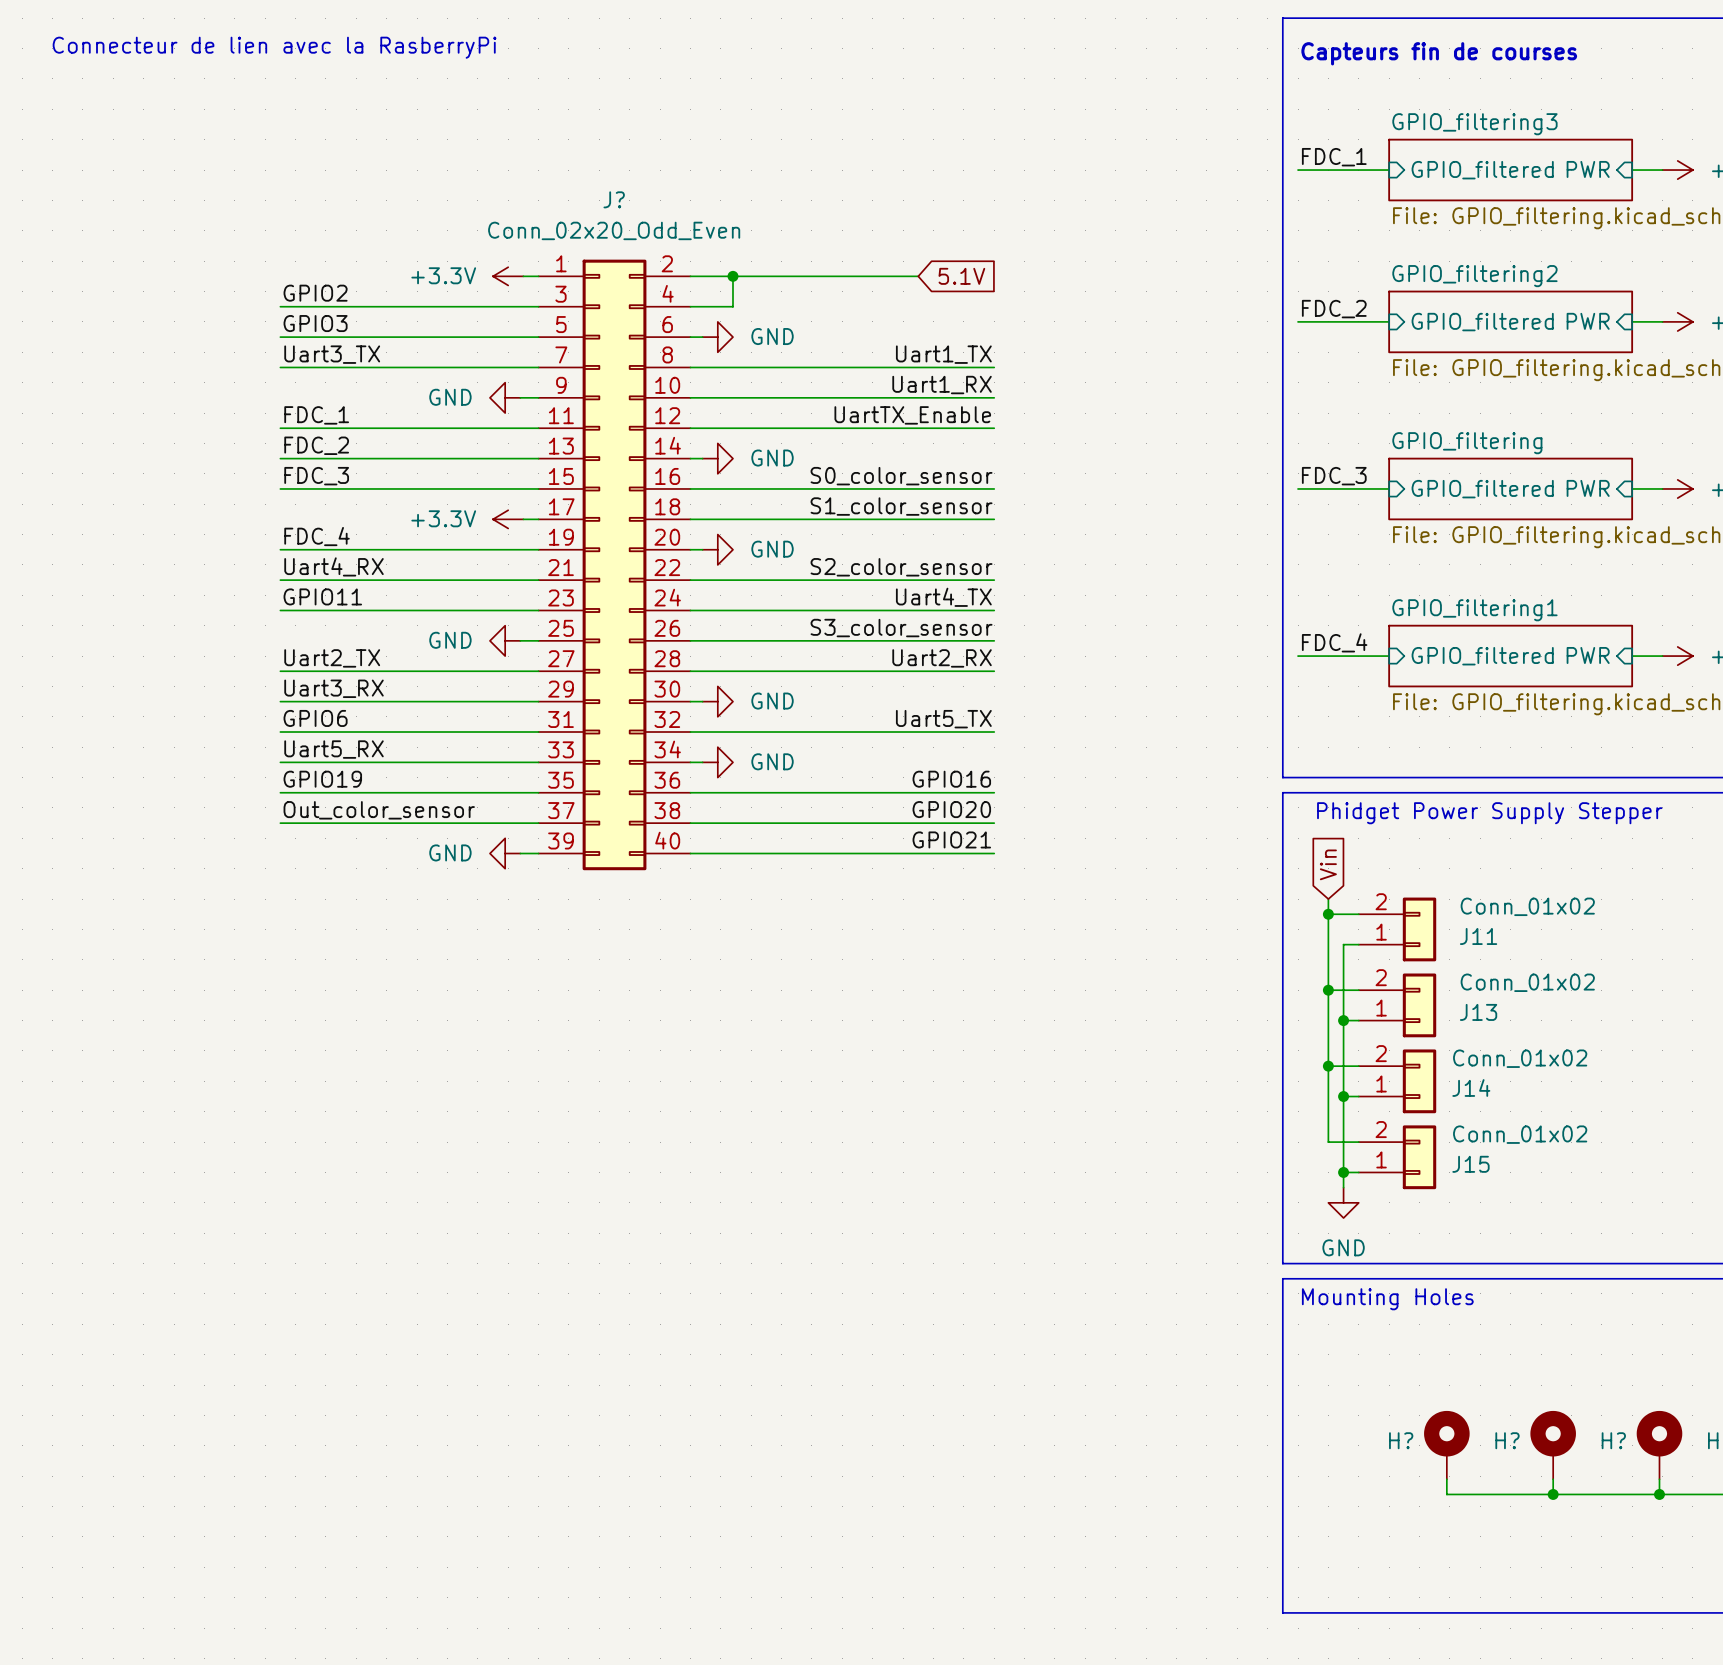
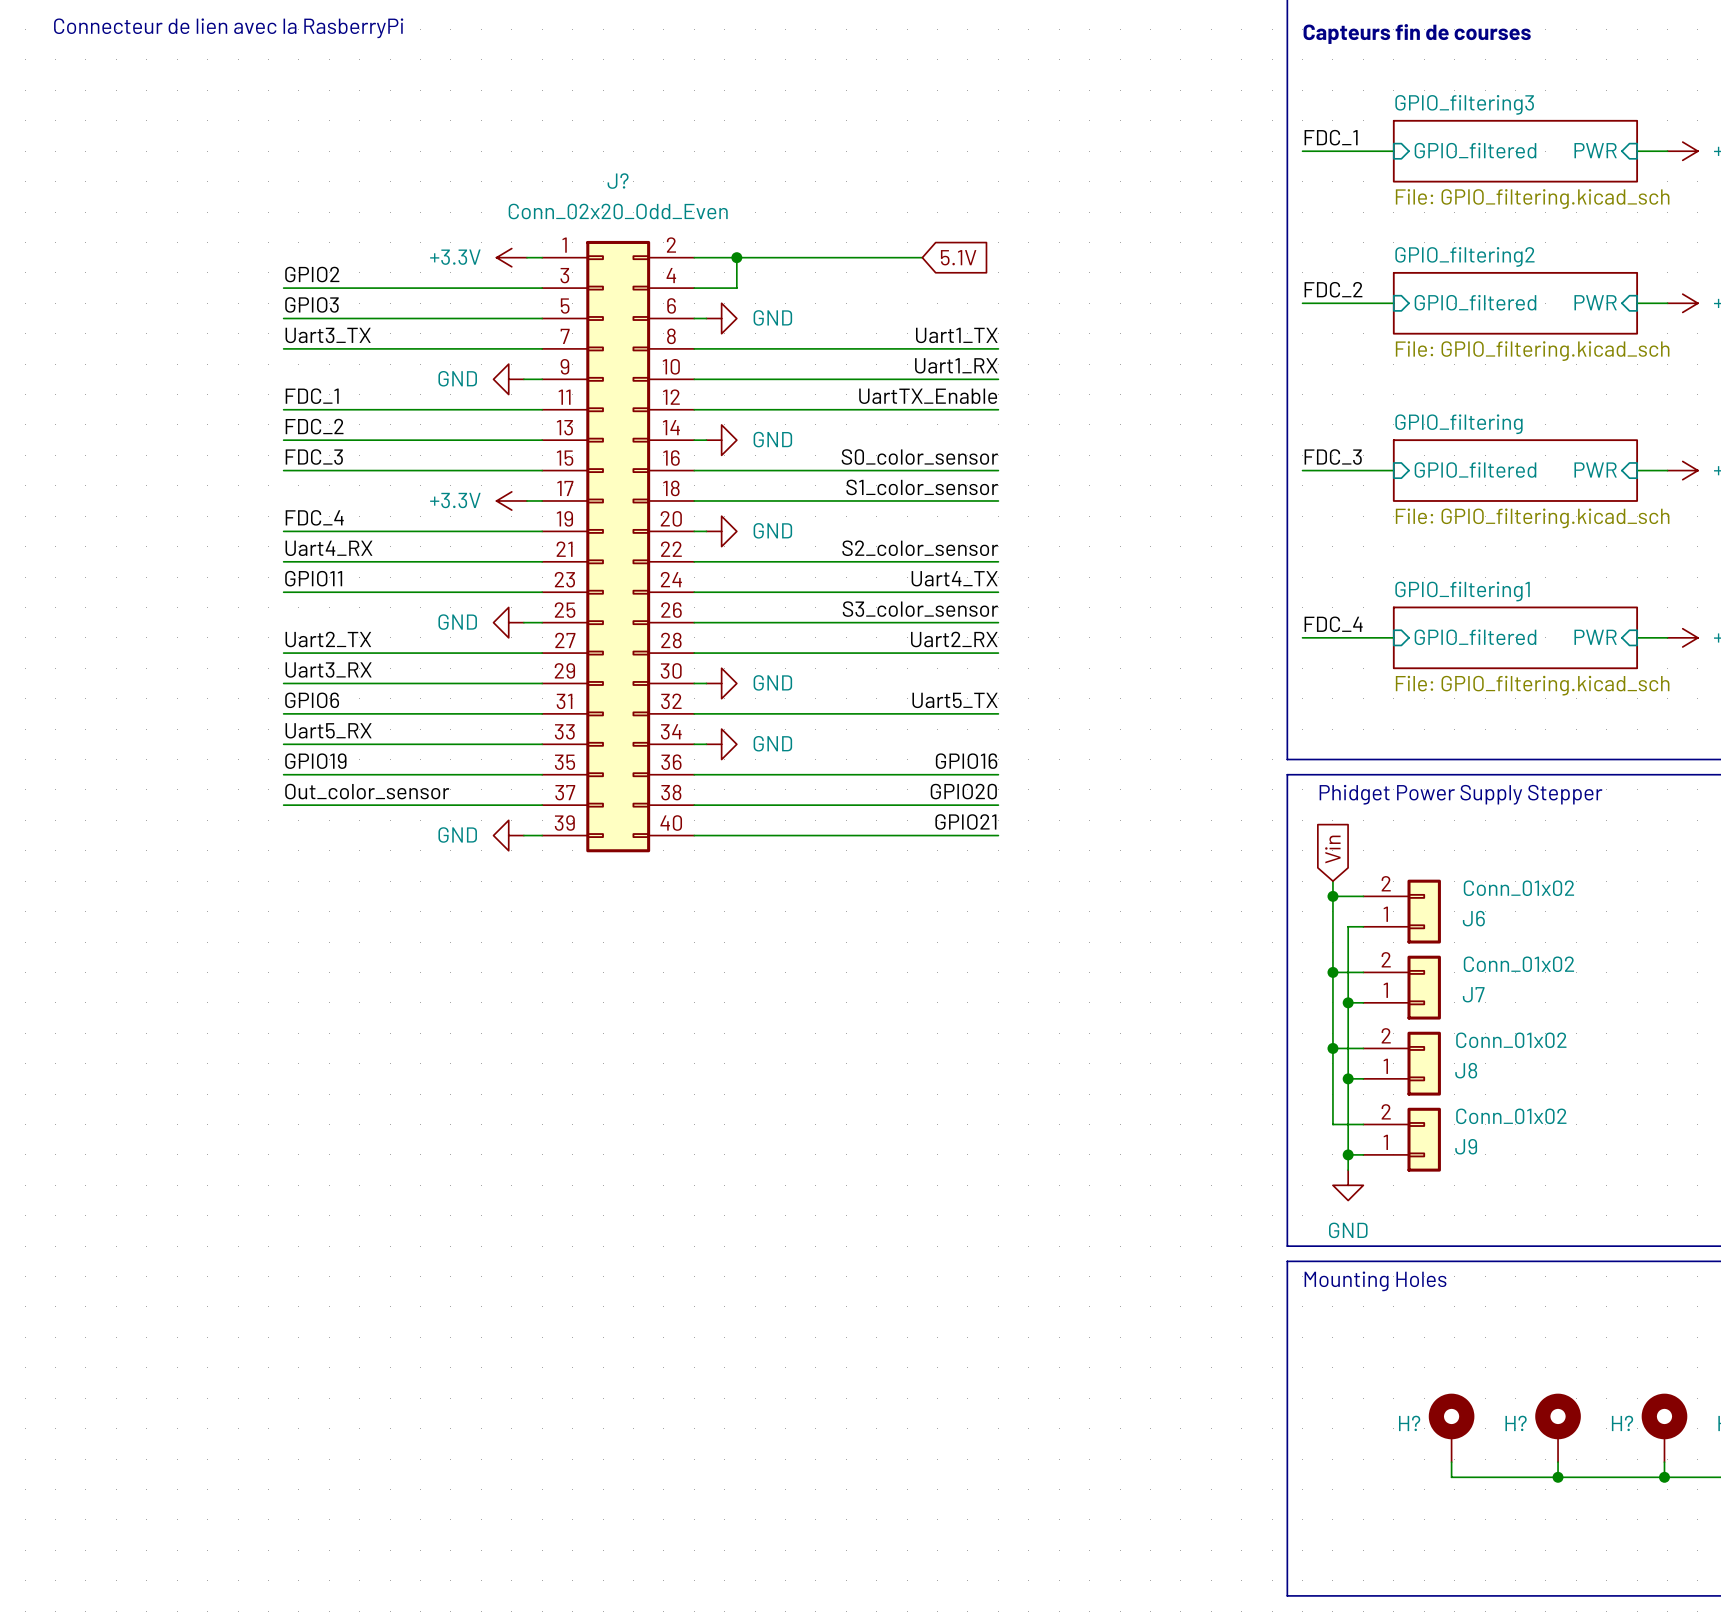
J11 name: J11 (1478, 936) -> J6 (1473, 918)
J13 name: J13 (1478, 1012) -> J7 (1473, 994)
J14 name: J14 (1471, 1088) -> J8 (1466, 1070)
J15 name: J15 (1470, 1164) -> J9 (1466, 1146)

